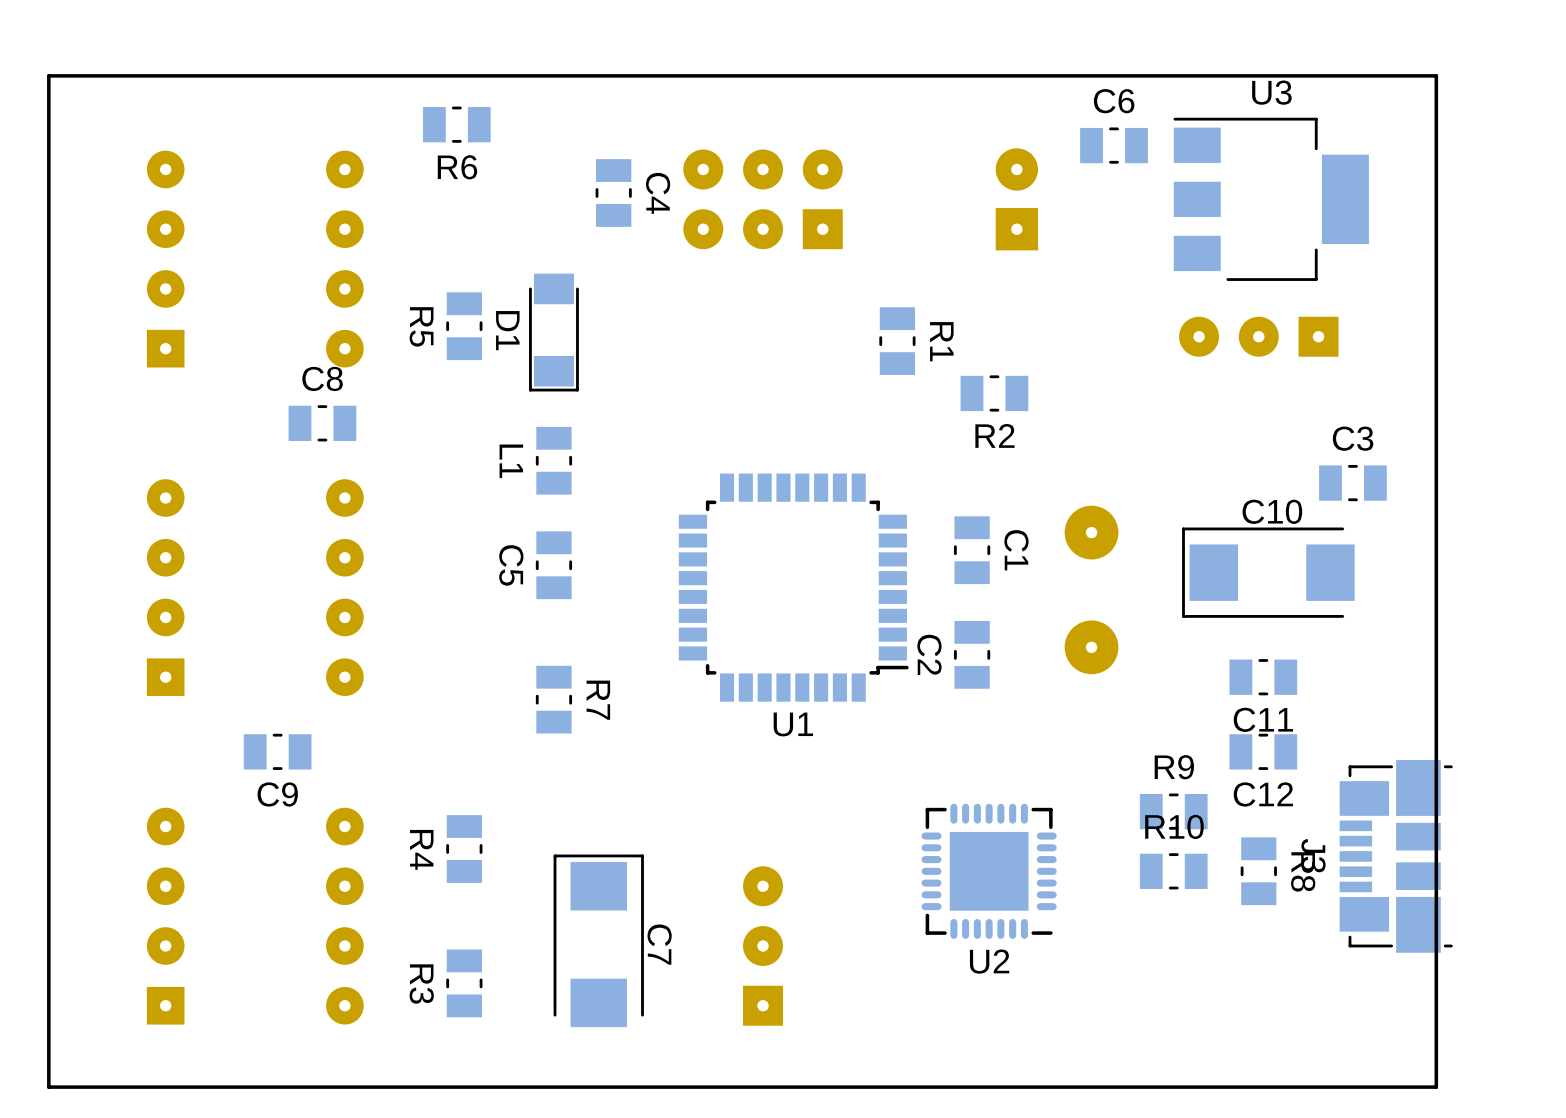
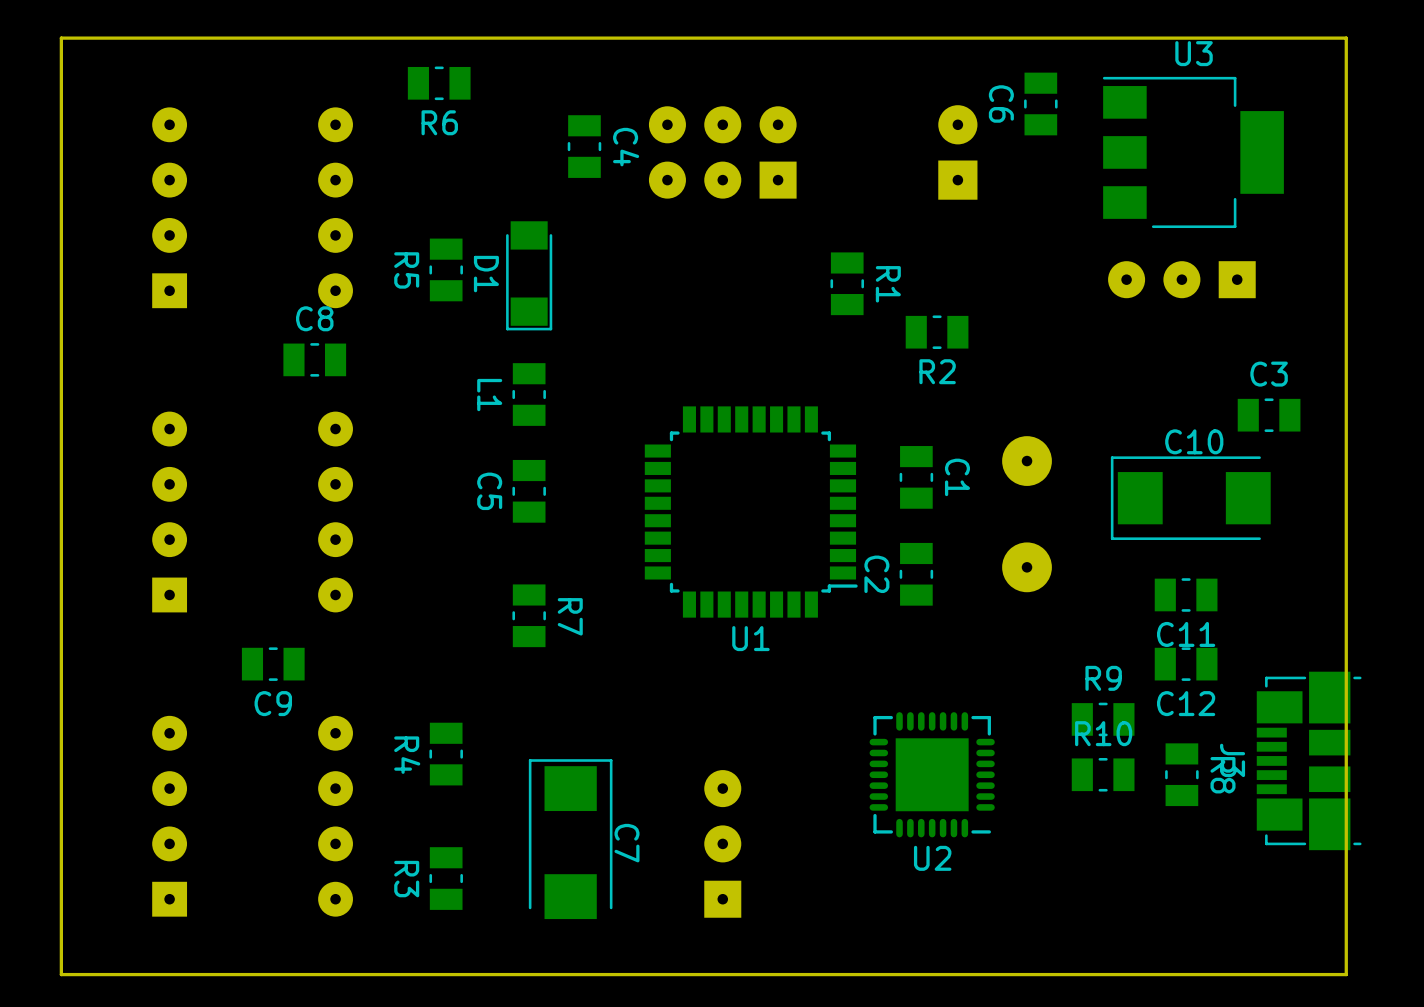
C6 name position: C6 (1114, 101) -> C6 (1001, 103)
C6 rotation: 0° (1114, 145) -> 90° clockwise (1040, 103)

